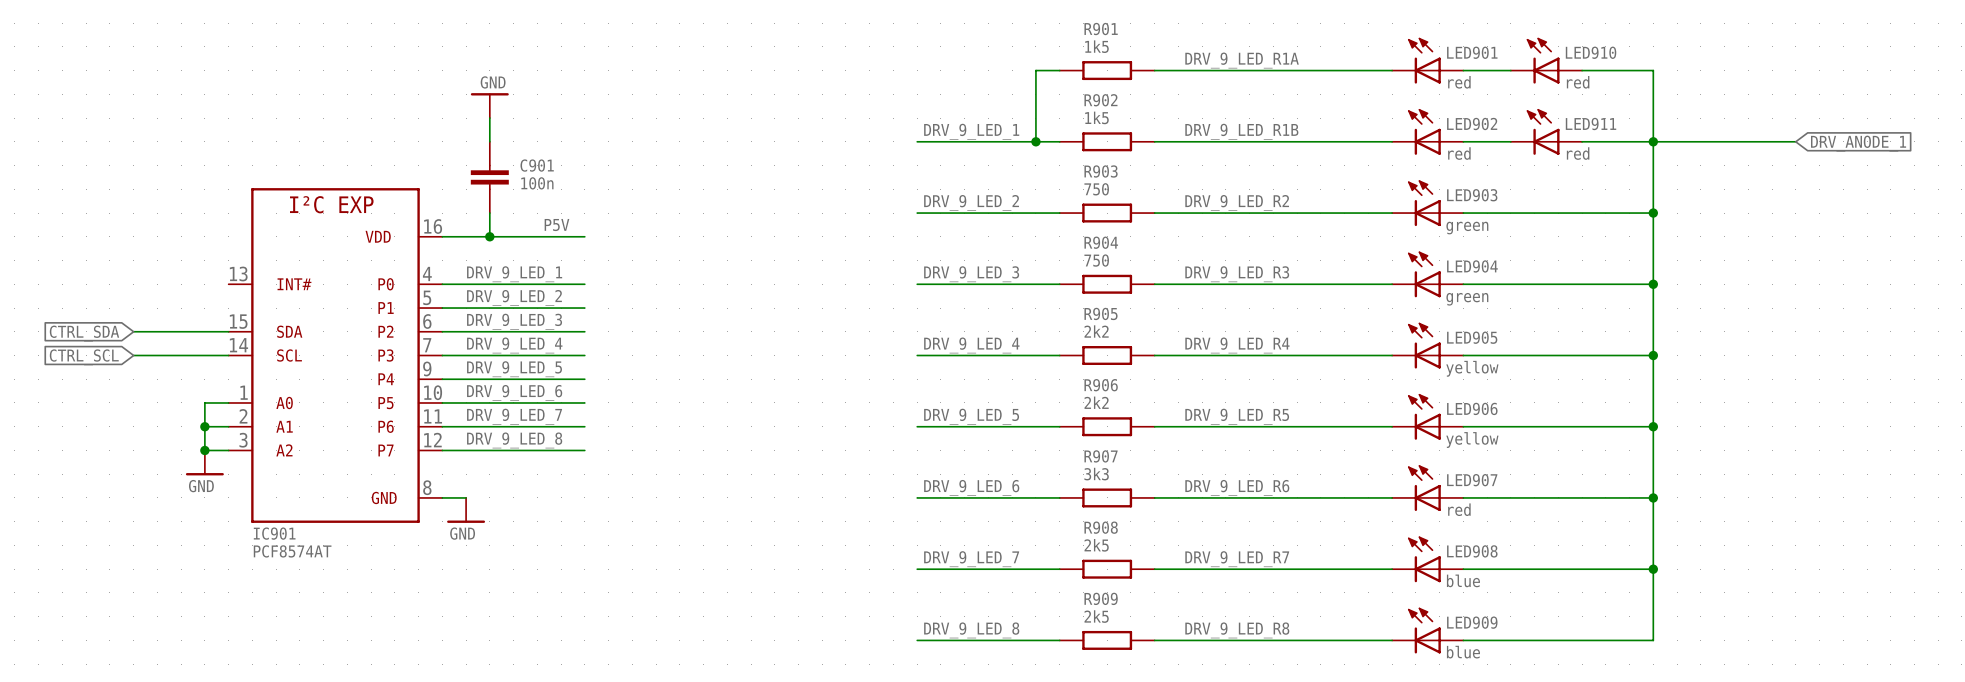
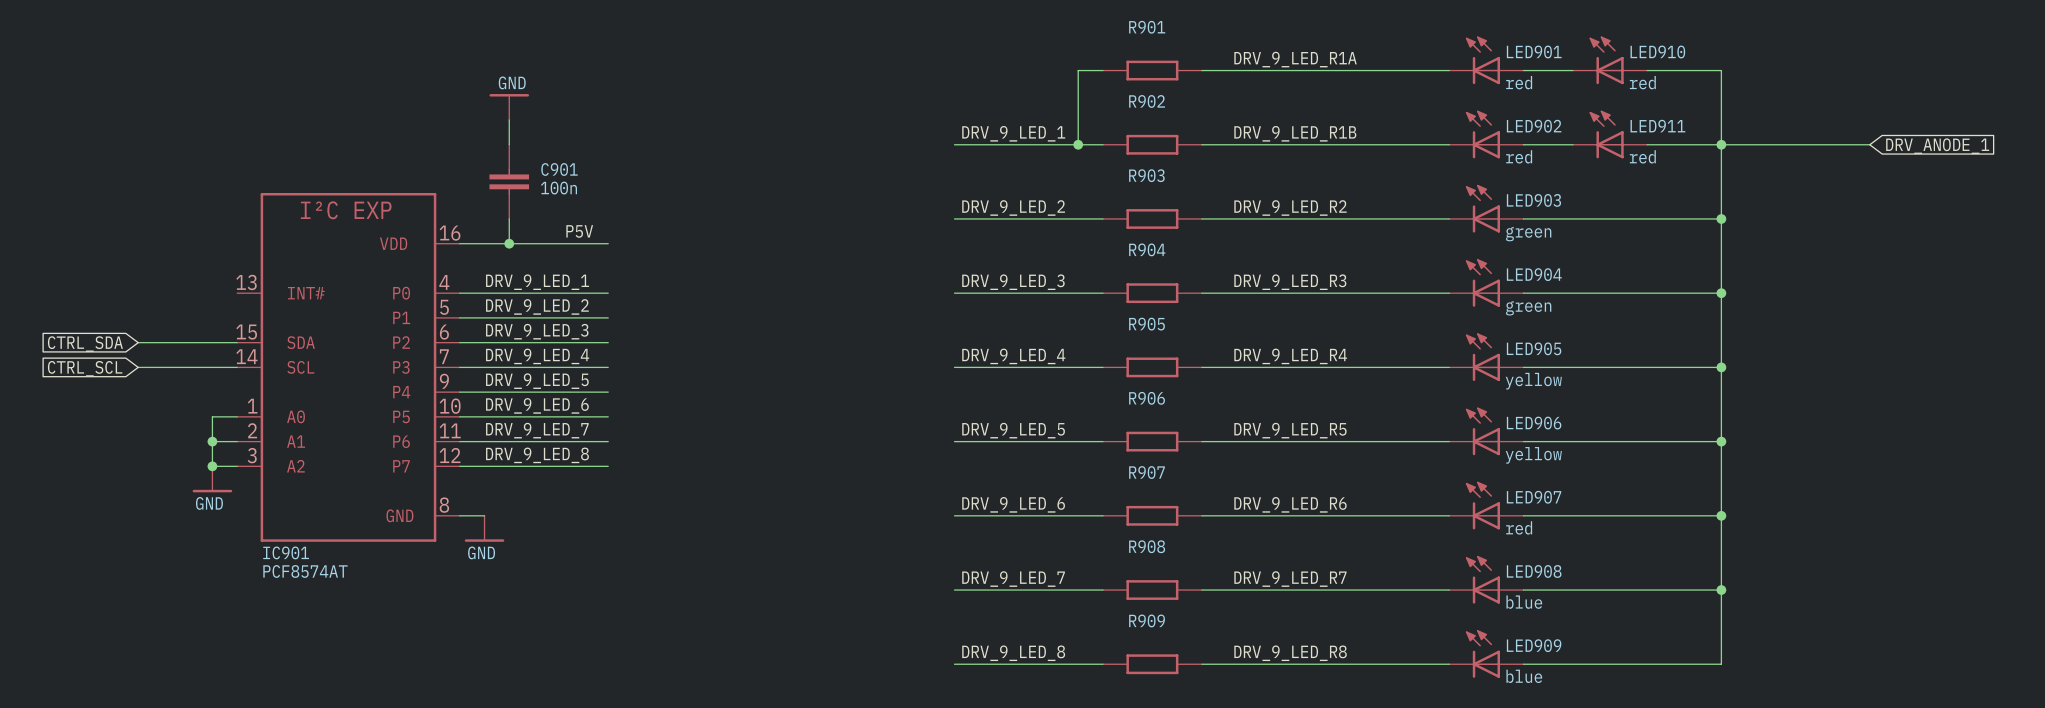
R901 value: 1k5 (1096, 46) -> none
R902 value: 1k5 (1096, 117) -> none
R903 value: 750 (1096, 189) -> none
R904 value: 750 (1096, 260) -> none
R905 value: 2k2 (1096, 331) -> none
R906 value: 2k2 (1096, 402) -> none
R907 value: 3k3 (1096, 474) -> none
R908 value: 2k5 (1096, 545) -> none
R909 value: 2k5 (1096, 616) -> none

